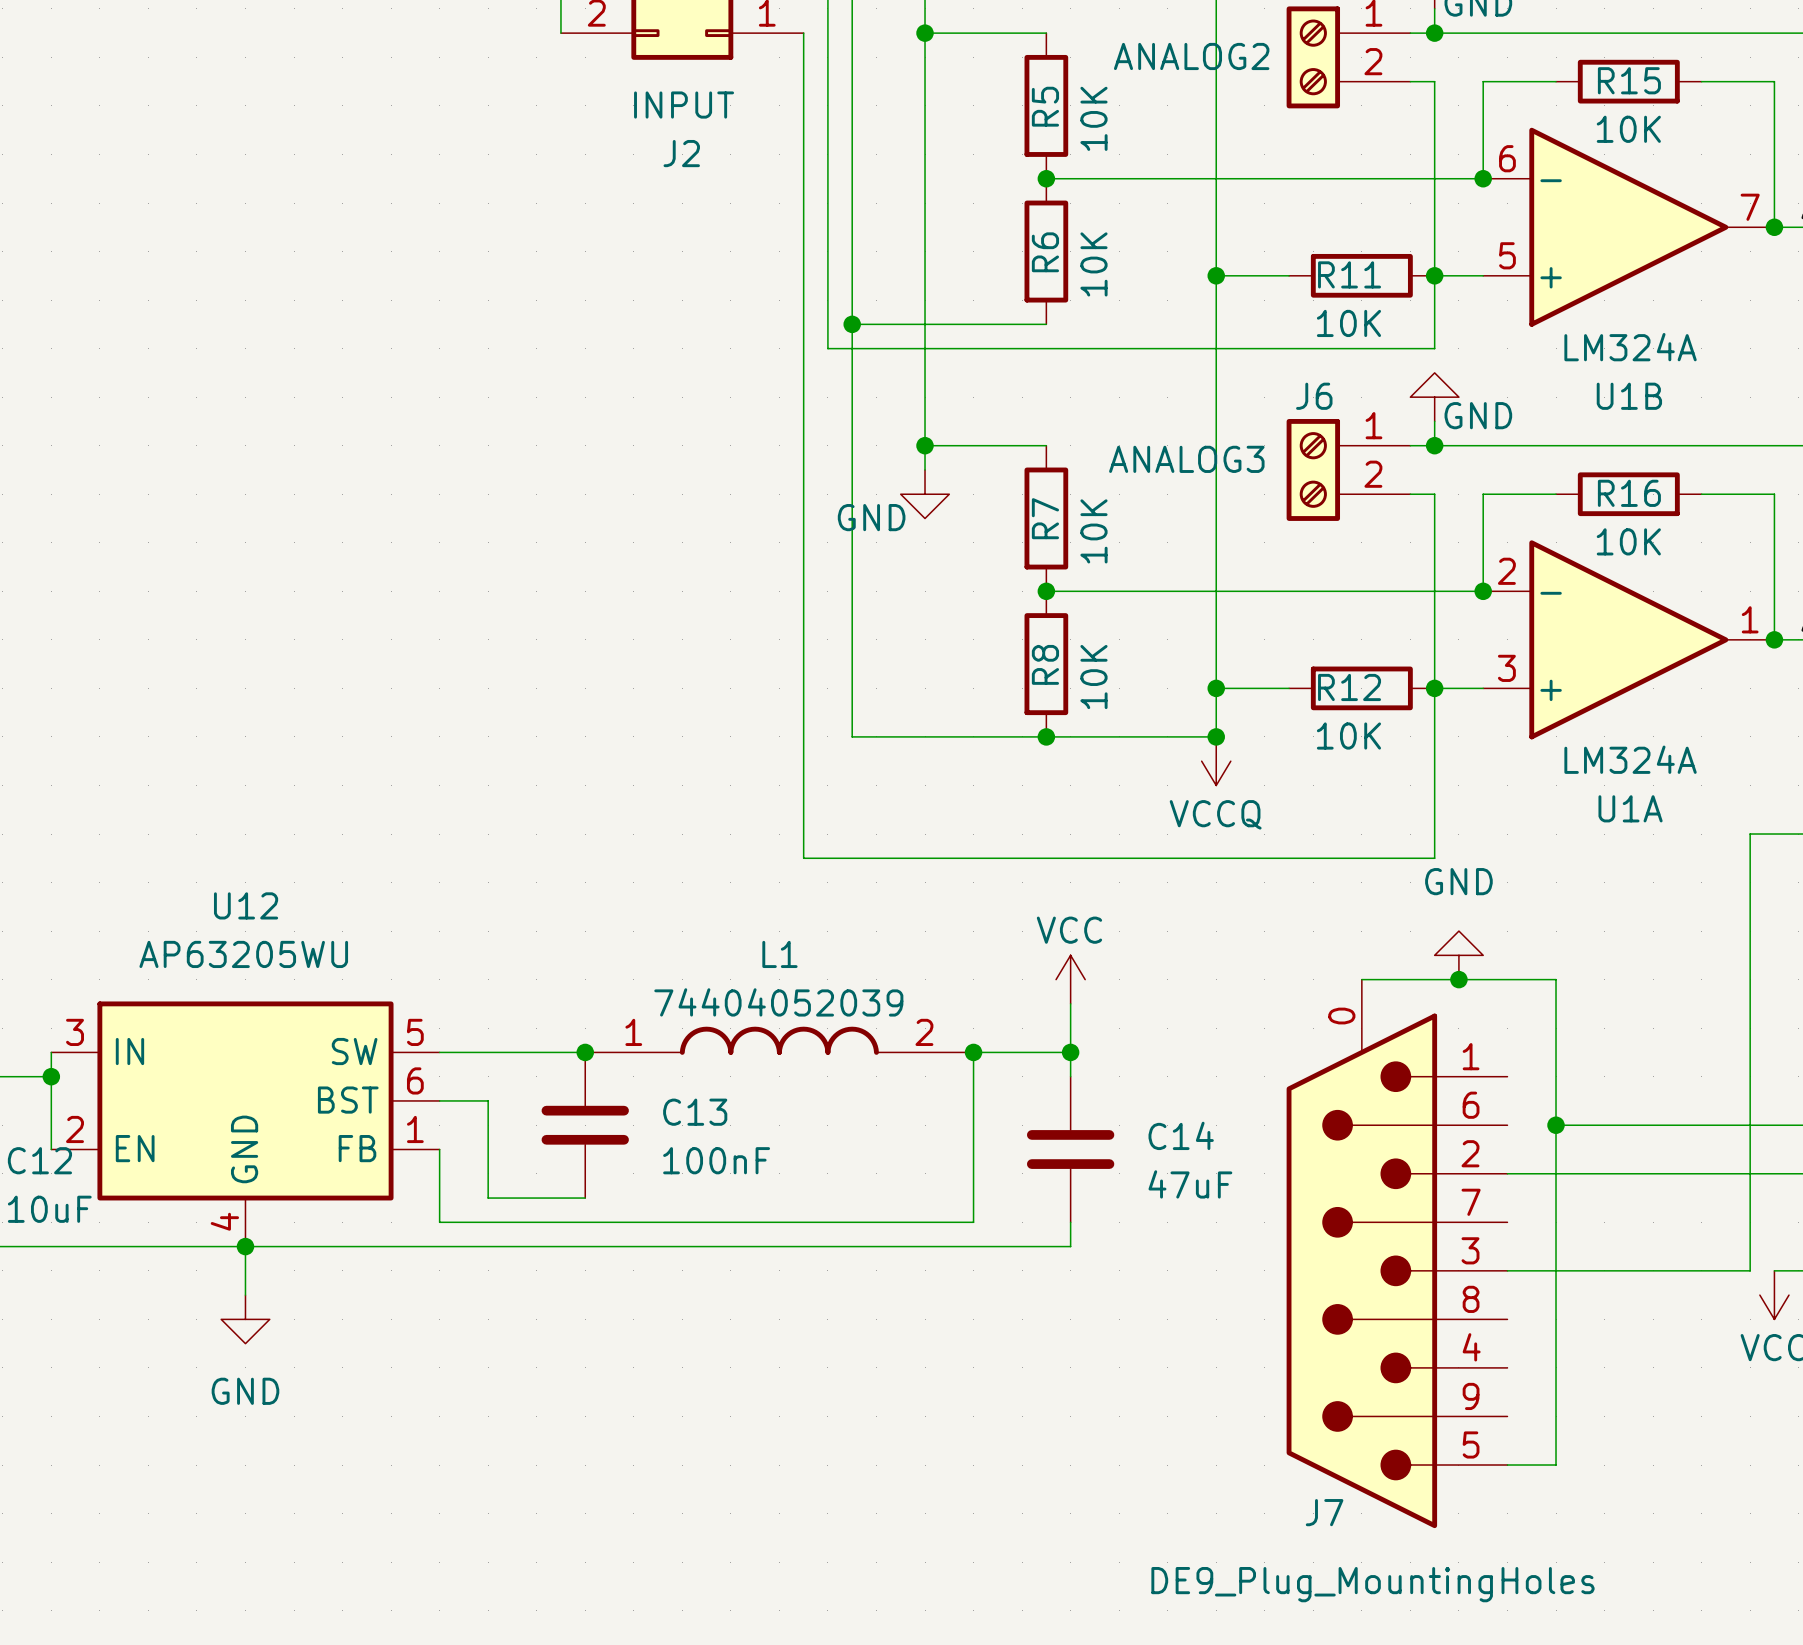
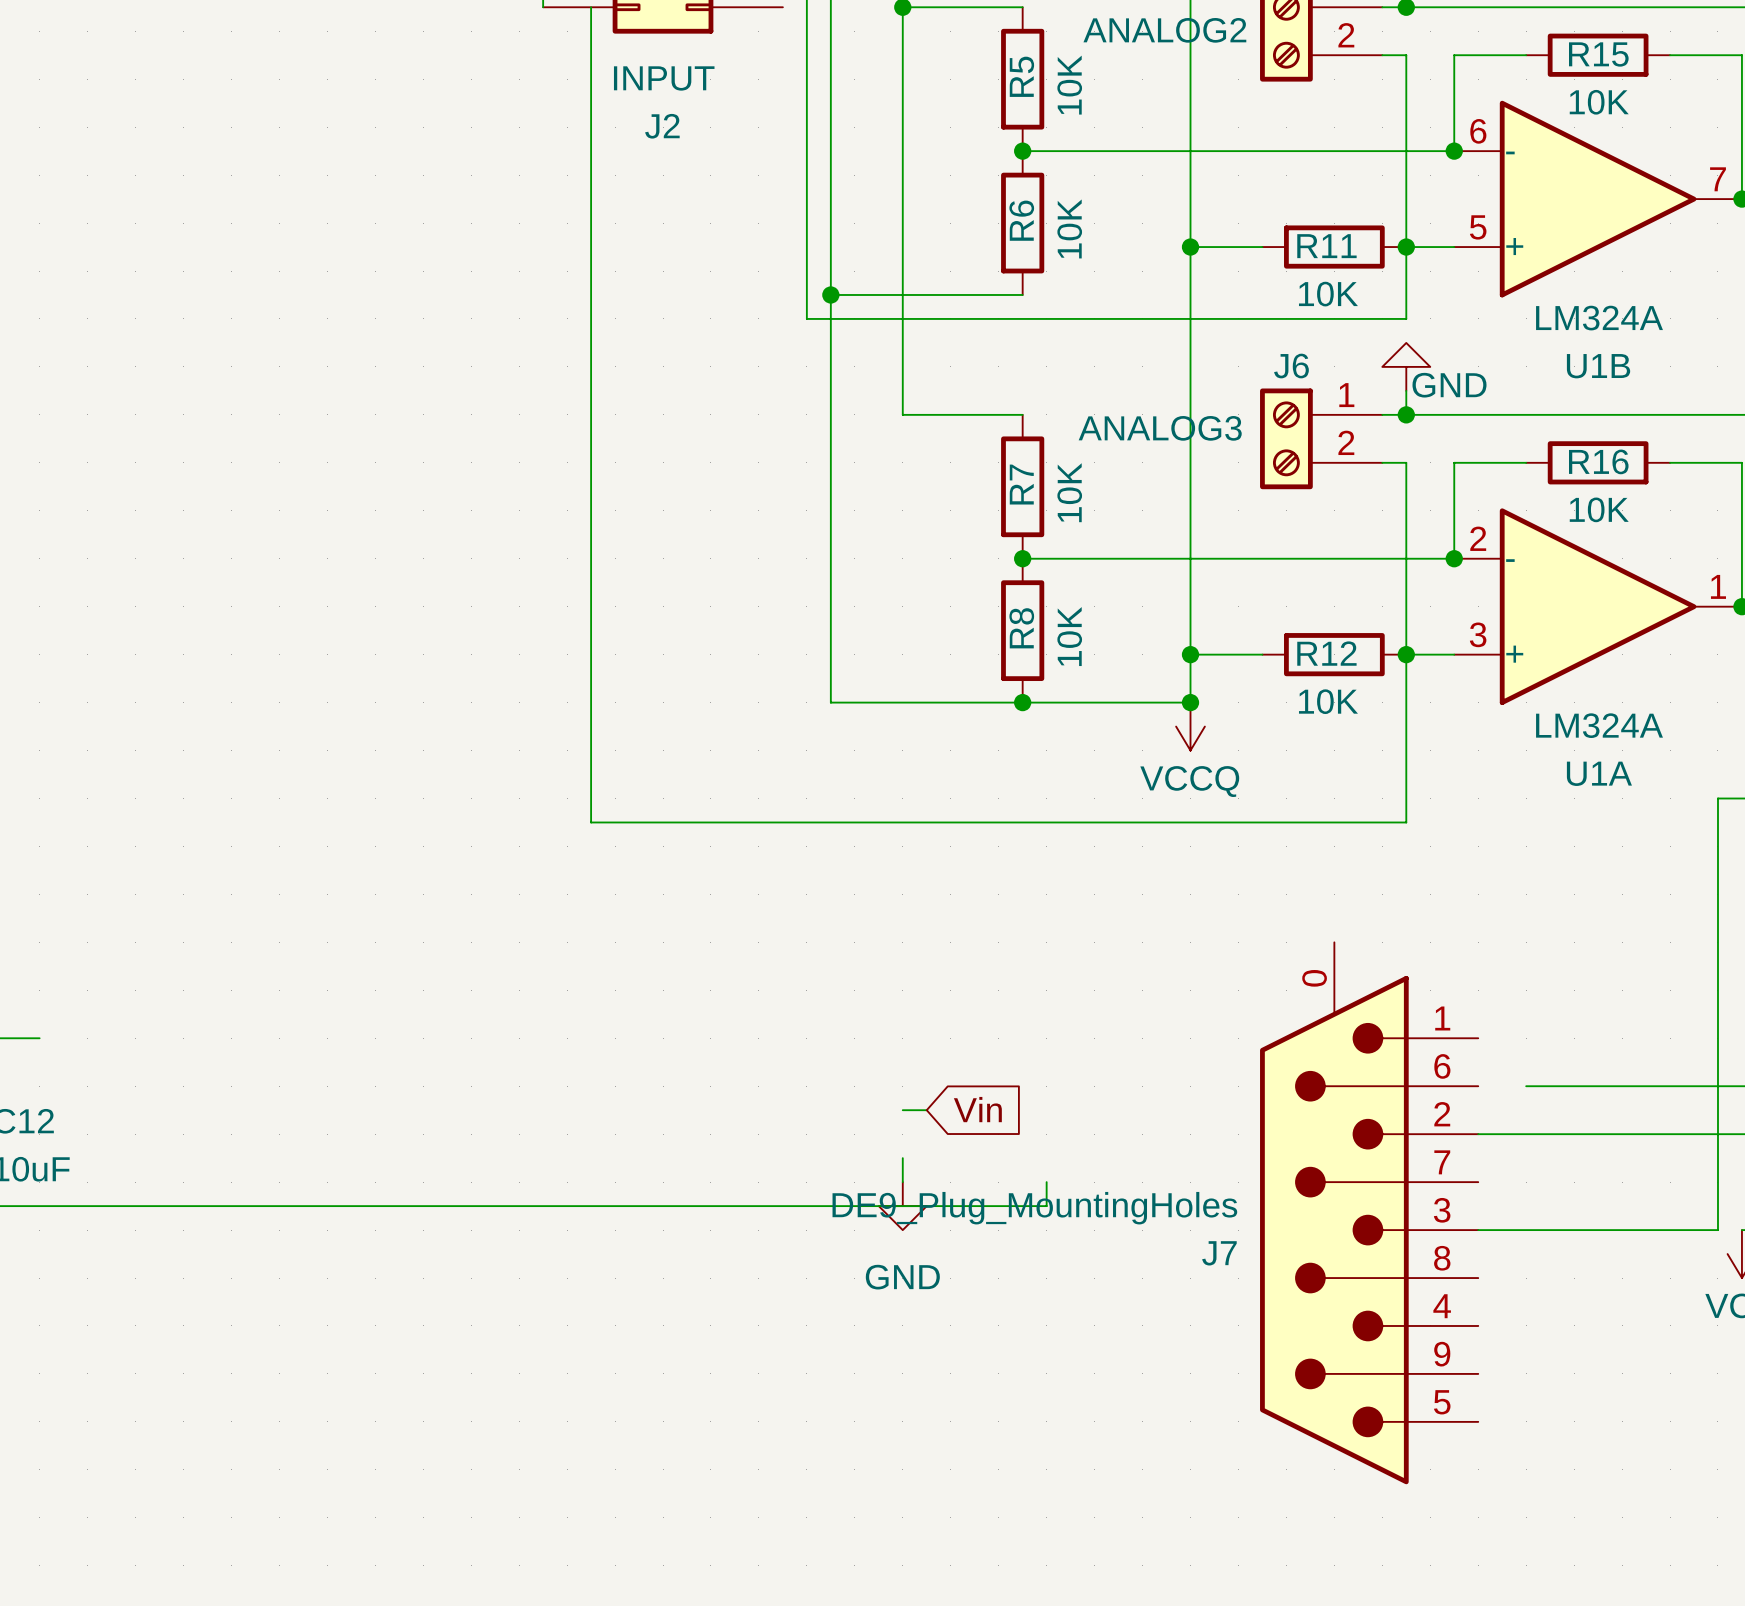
wire: (803, 33) (803, 858) -> (591, 7) (591, 822) (782, 822)
wire: (925, 445) (925, 469) -> none
junction: (925, 445) -> none
power symbol: GND (925, 494) -> none
power symbol: GND (1458, 955) -> none
power symbol: VCC (1070, 979) -> none
wire: (1361, 979) (1556, 979) (1556, 1465) (1507, 1465) -> none
junction: (1458, 979) -> none
wire: (1070, 1003) (1070, 1076) -> none
L1: 74404052039 (779, 1040) -> none
wire: (51, 1052) (51, 1149) -> none
wire: (439, 1052) (585, 1052) -> none
junction: (585, 1052) -> none
junction: (973, 1052) -> none
wire: (1070, 1052) (973, 1052) (973, 1222) (439, 1222) (439, 1149) -> none
junction: (1070, 1052) -> none
junction: (51, 1076) -> none
wire: (439, 1100) (488, 1100) (488, 1198) (585, 1198) -> none
U12: AP63205WU (245, 1124) -> none
C13: 100nF (585, 1125) -> none
junction: (1556, 1125) -> none
wire: none -> (902, 1110) (926, 1110)
global label: none -> Vin (977, 1109)
C14: 47uF (1070, 1149) -> none
wire: none -> (902, 1158) (902, 1182)
wire: (245, 1246) (245, 1295) -> none
junction: (245, 1246) -> none
power symbol: none -> GND (902, 1206)
power symbol: GND (245, 1319) -> none
J7 name position: J7 (1324, 1512) -> J7 (1219, 1253)
J7 value position: DE9_Plug_MountingHoles (1372, 1584) -> DE9_Plug_MountingHoles (1034, 1208)

